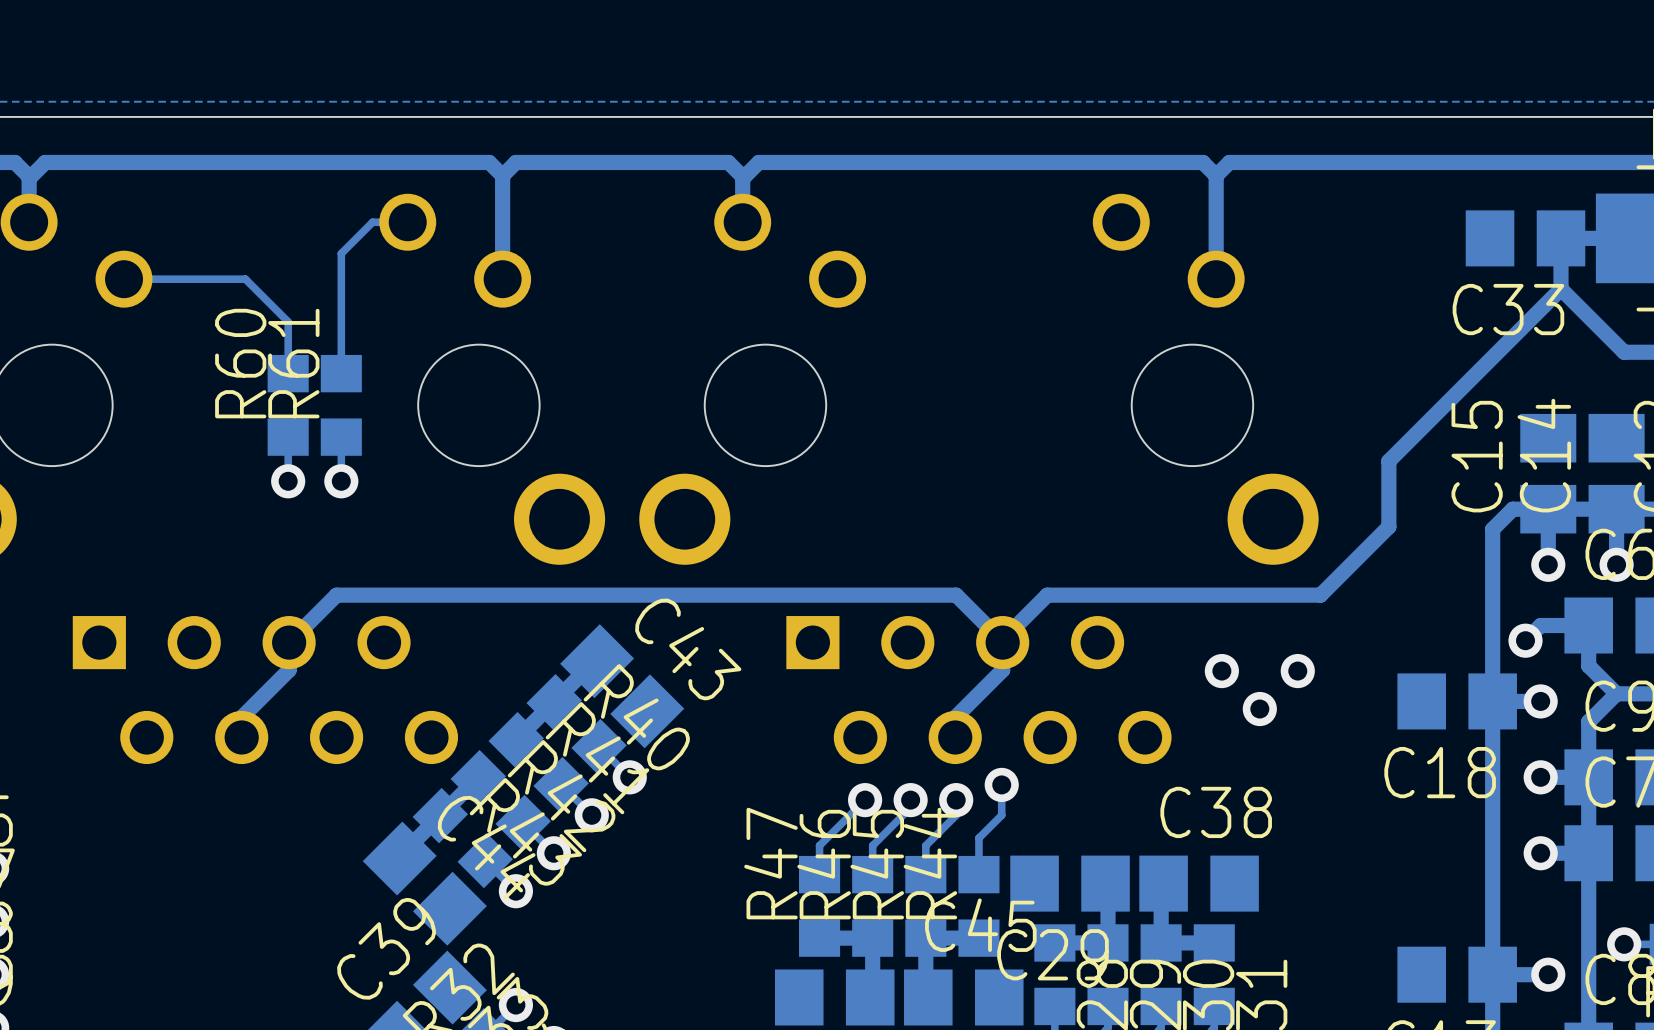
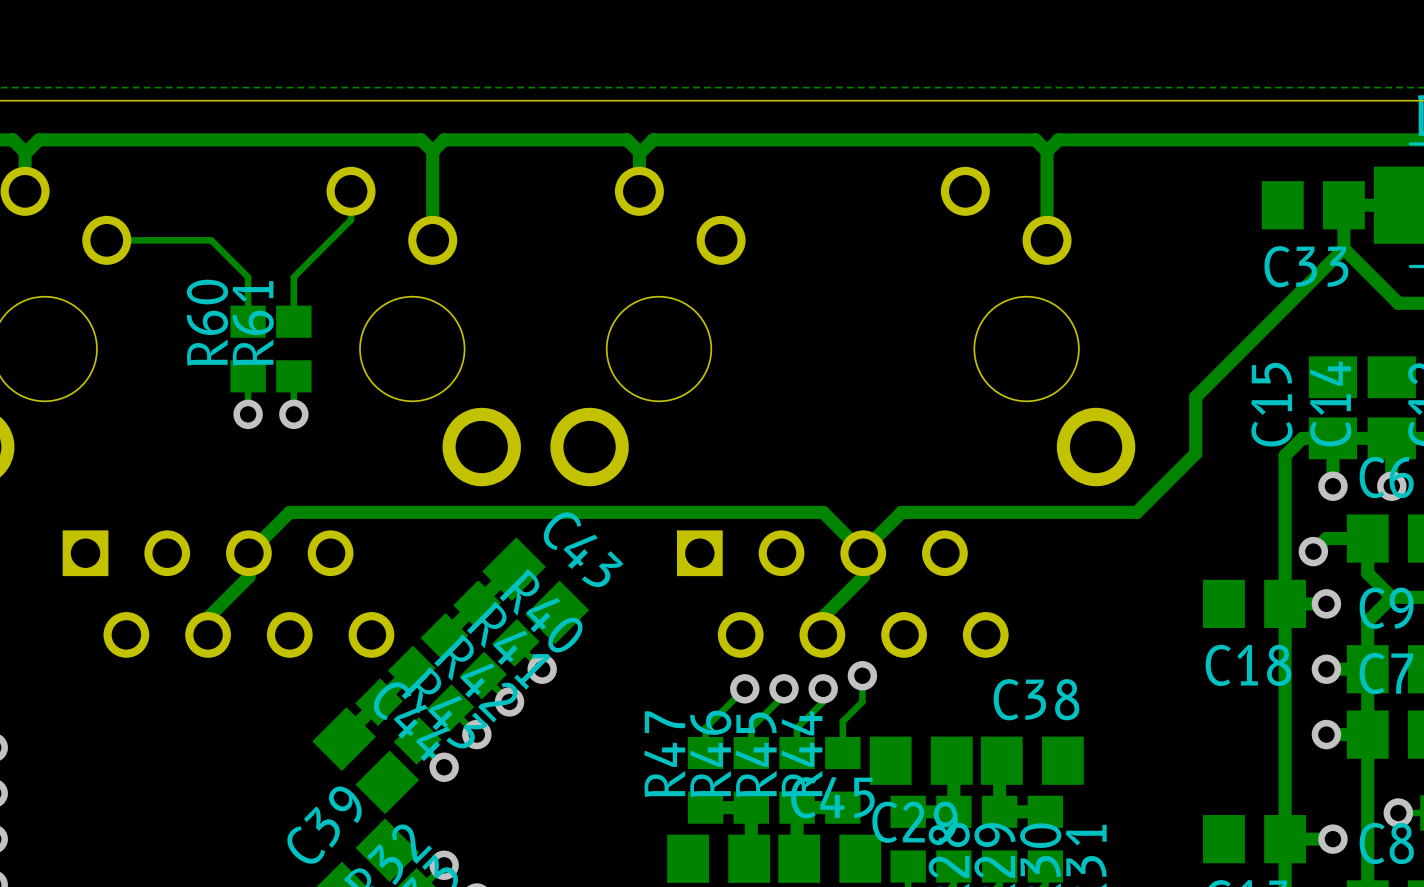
track: (407, 222) (372, 222) (341, 253) (341, 321) -> (351, 191) (351, 219) (293, 277)
via: (1221, 671) -> none
via: (1297, 671) -> none
via: (1259, 709) -> none

